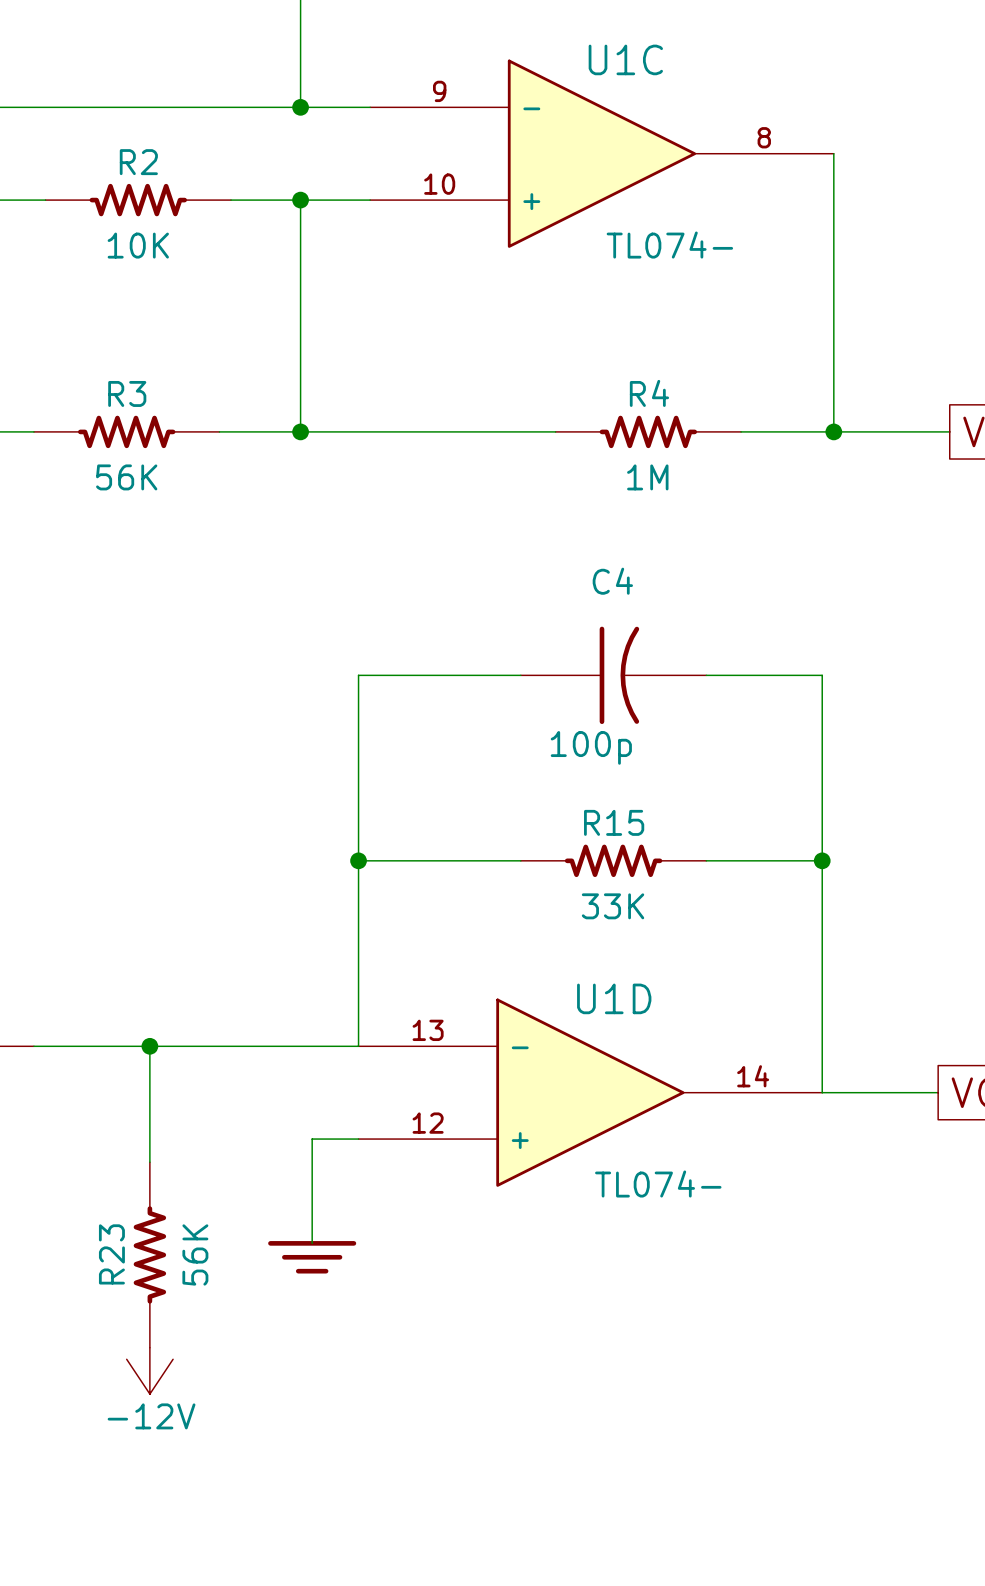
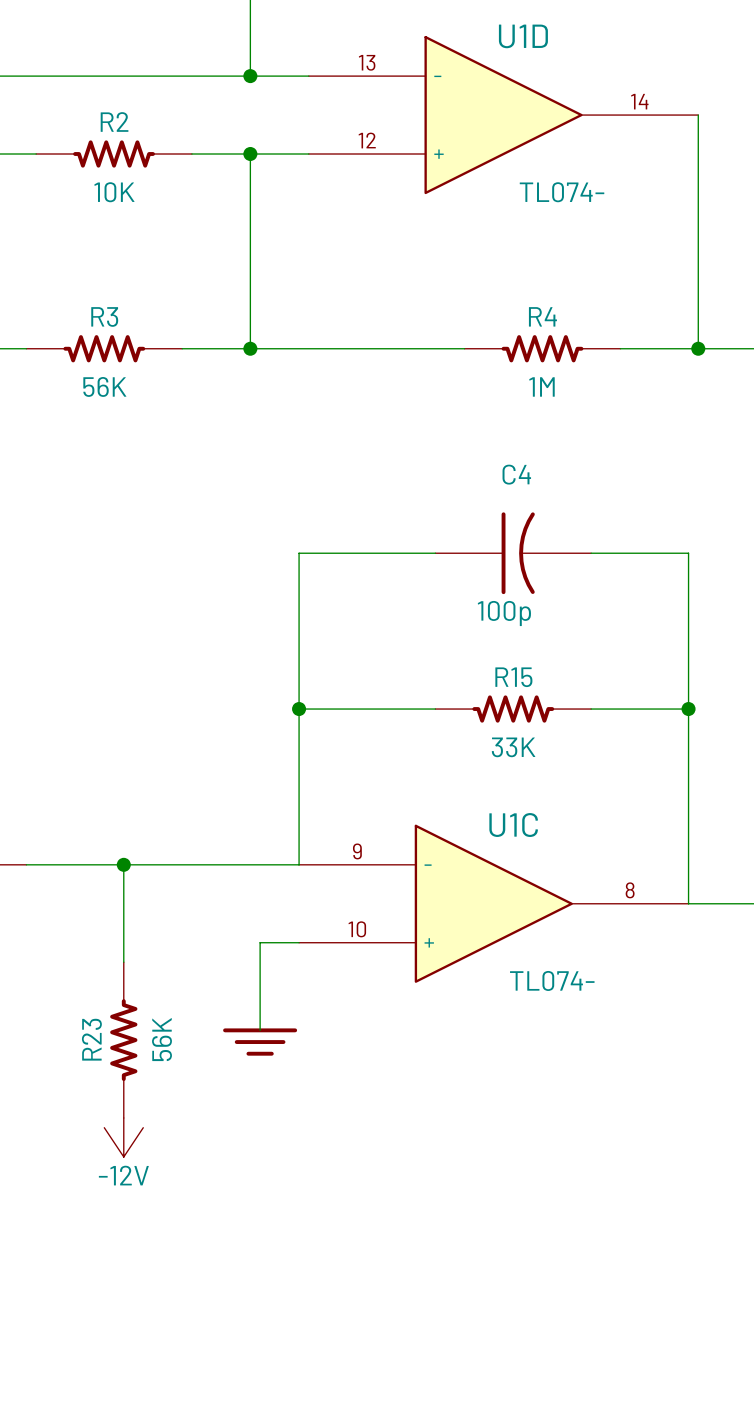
U1C position: (601, 153) -> (493, 903)
U1D position: (590, 1092) -> (503, 115)

